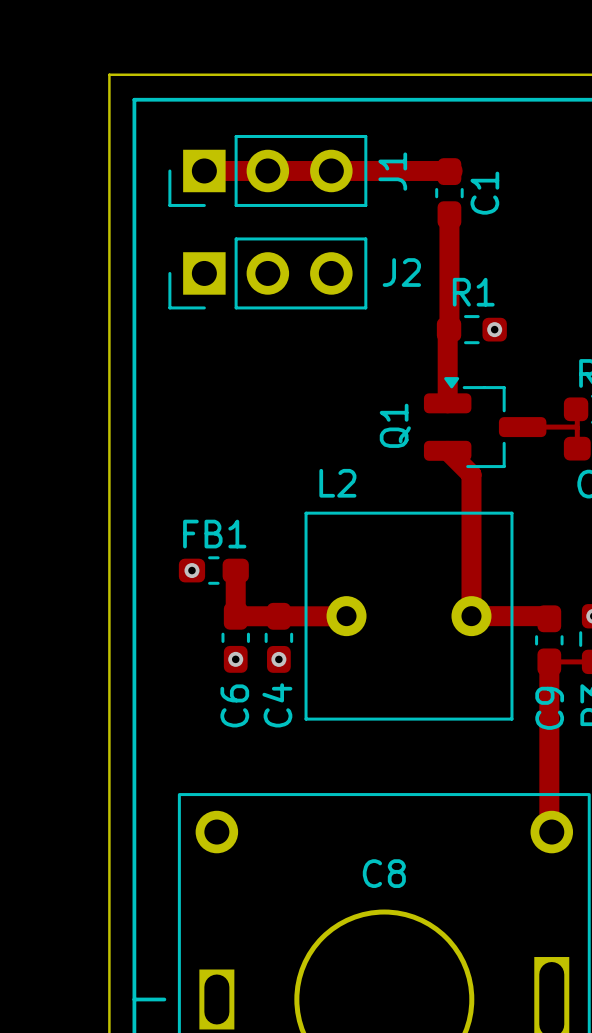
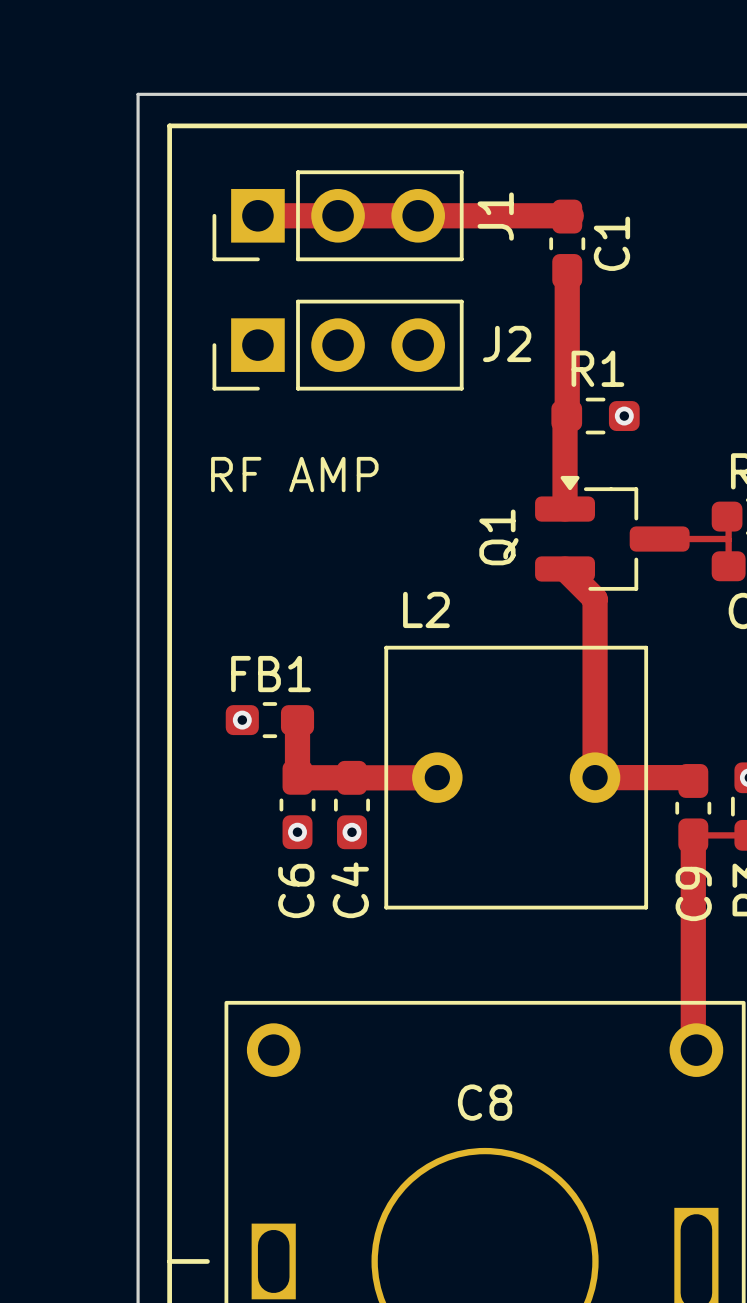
text: none -> RF AMP (294, 474)

